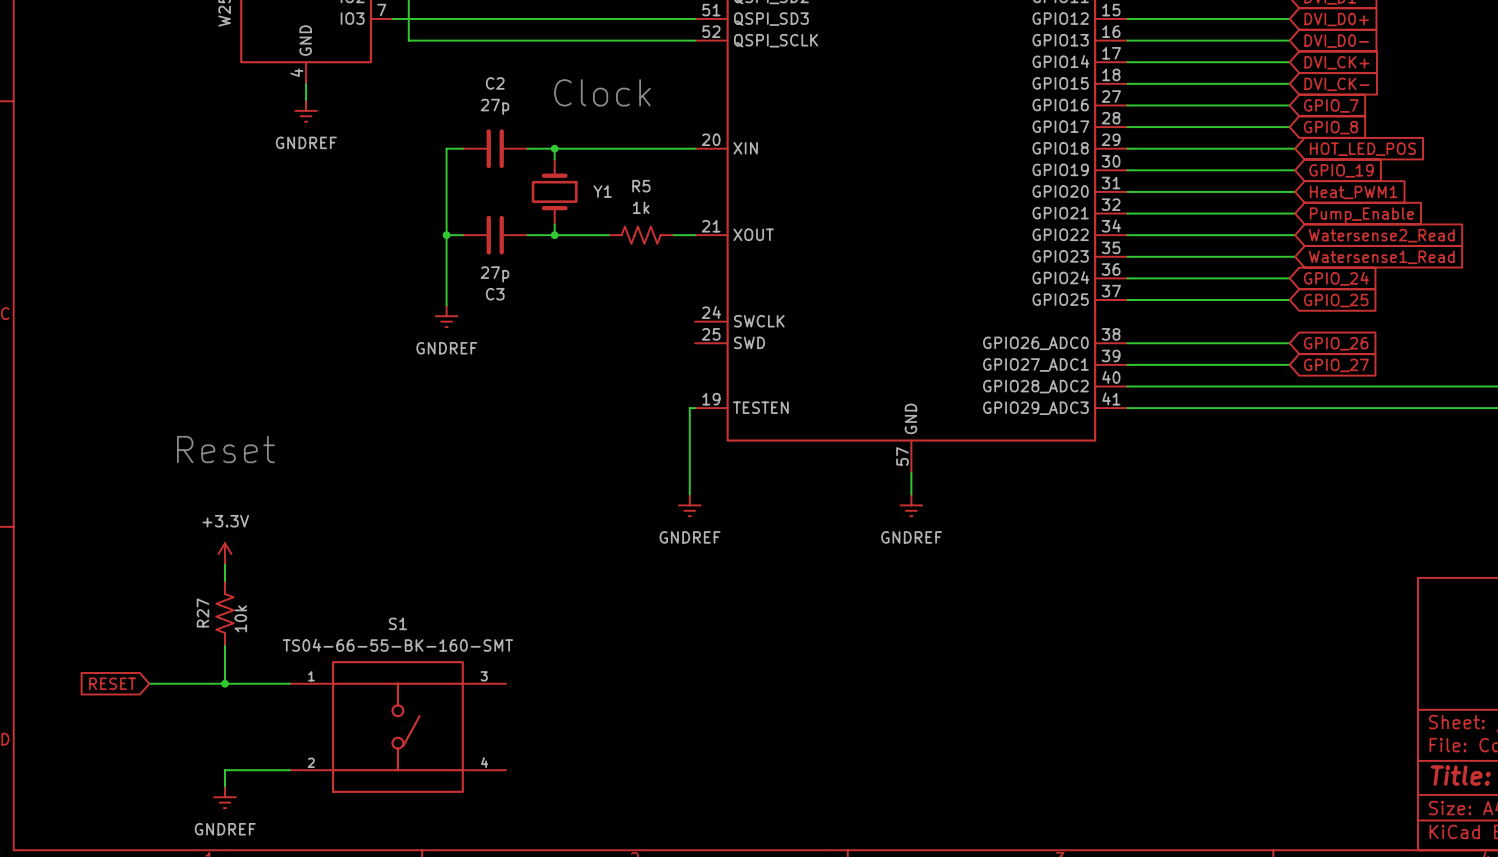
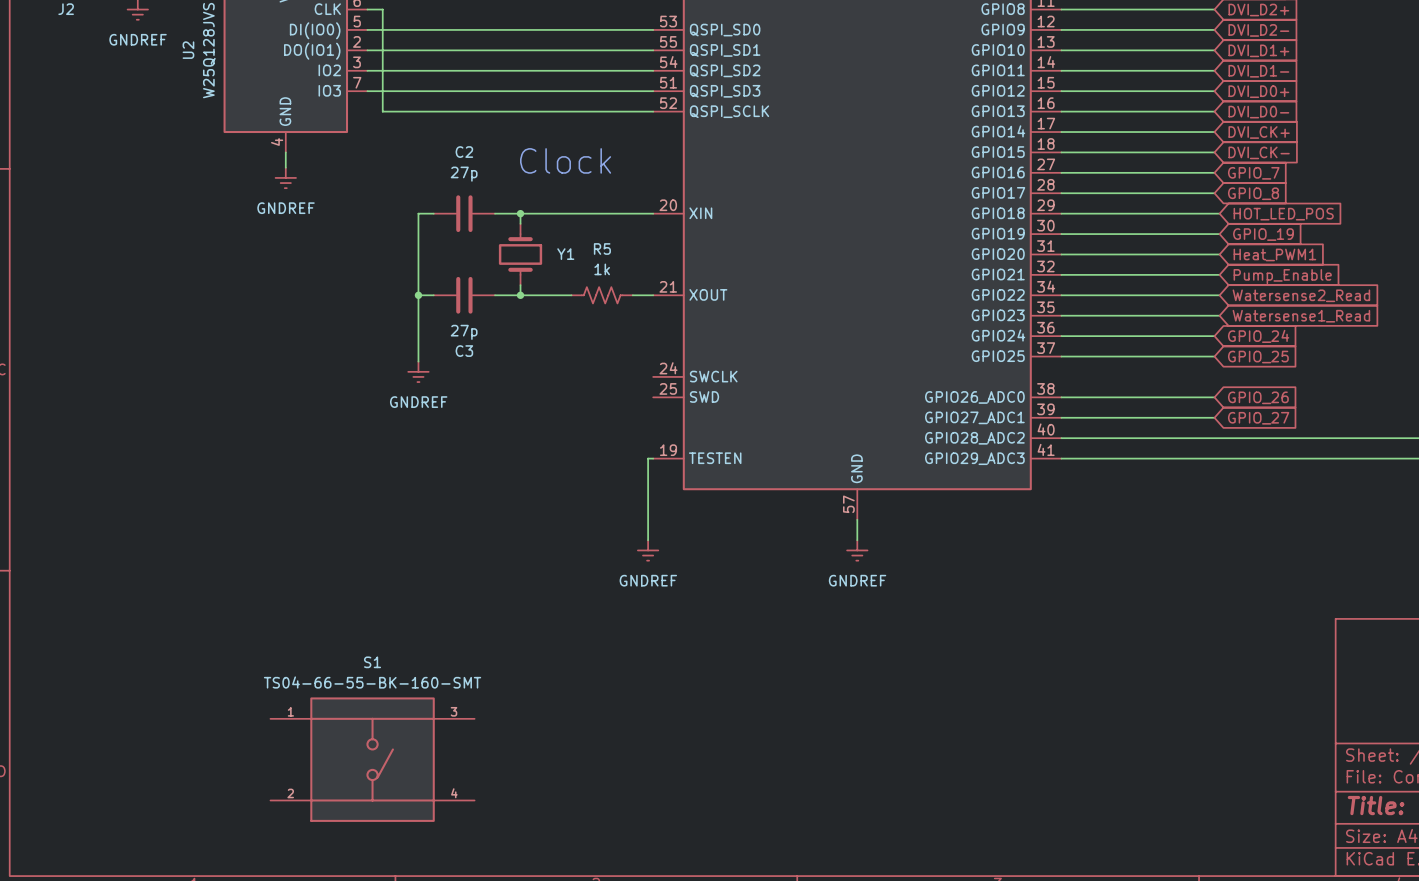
text: Reset (225, 449) -> none
power symbol: +3.3V (225, 554) -> none
wire: (225, 564) (225, 581) -> none
R27: 10k (225, 613) -> none
wire: (225, 645) (225, 683) -> none
global label: RESET (112, 683) -> none
wire: (149, 683) (289, 683) -> none
junction: (225, 683) -> none
wire: (289, 770) (225, 770) (225, 786) -> none
power symbol: GNDREF (225, 797) -> none

